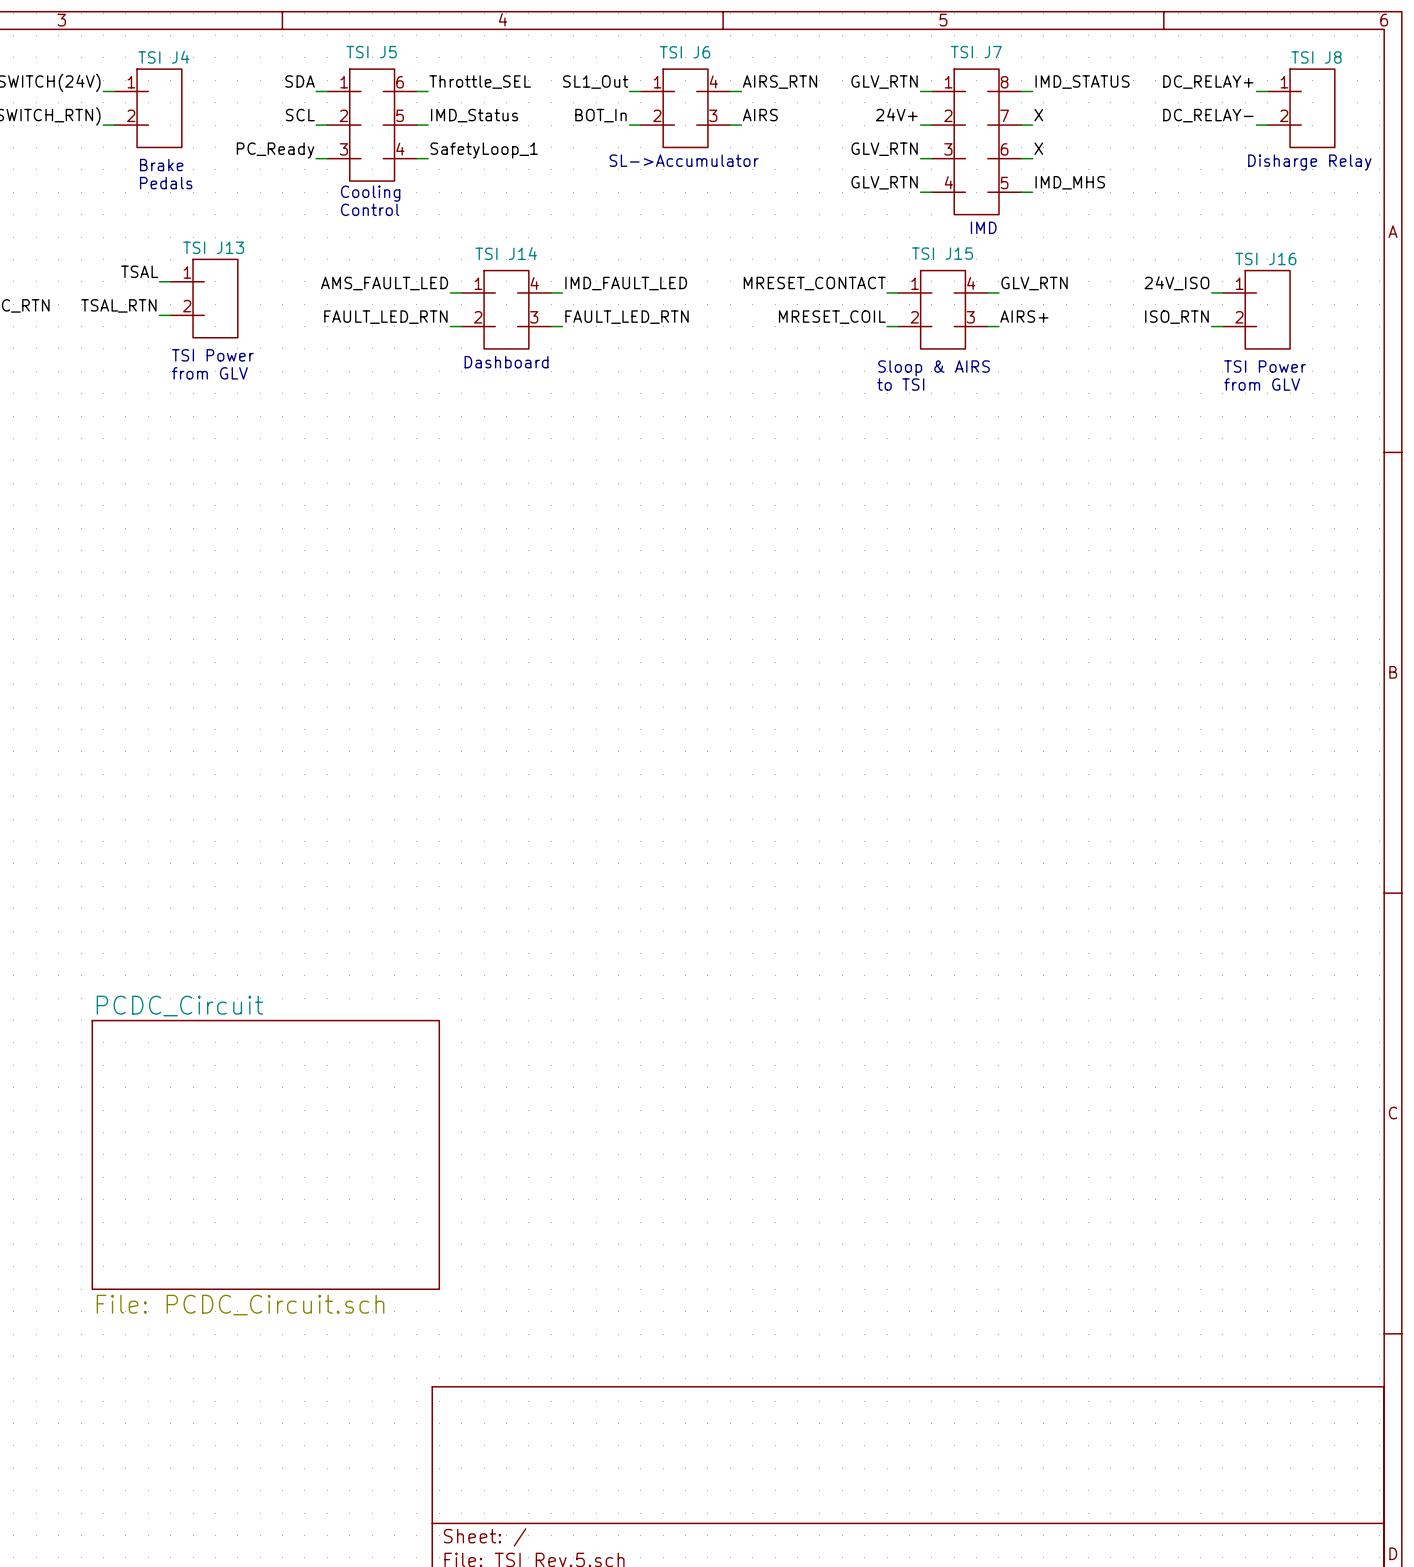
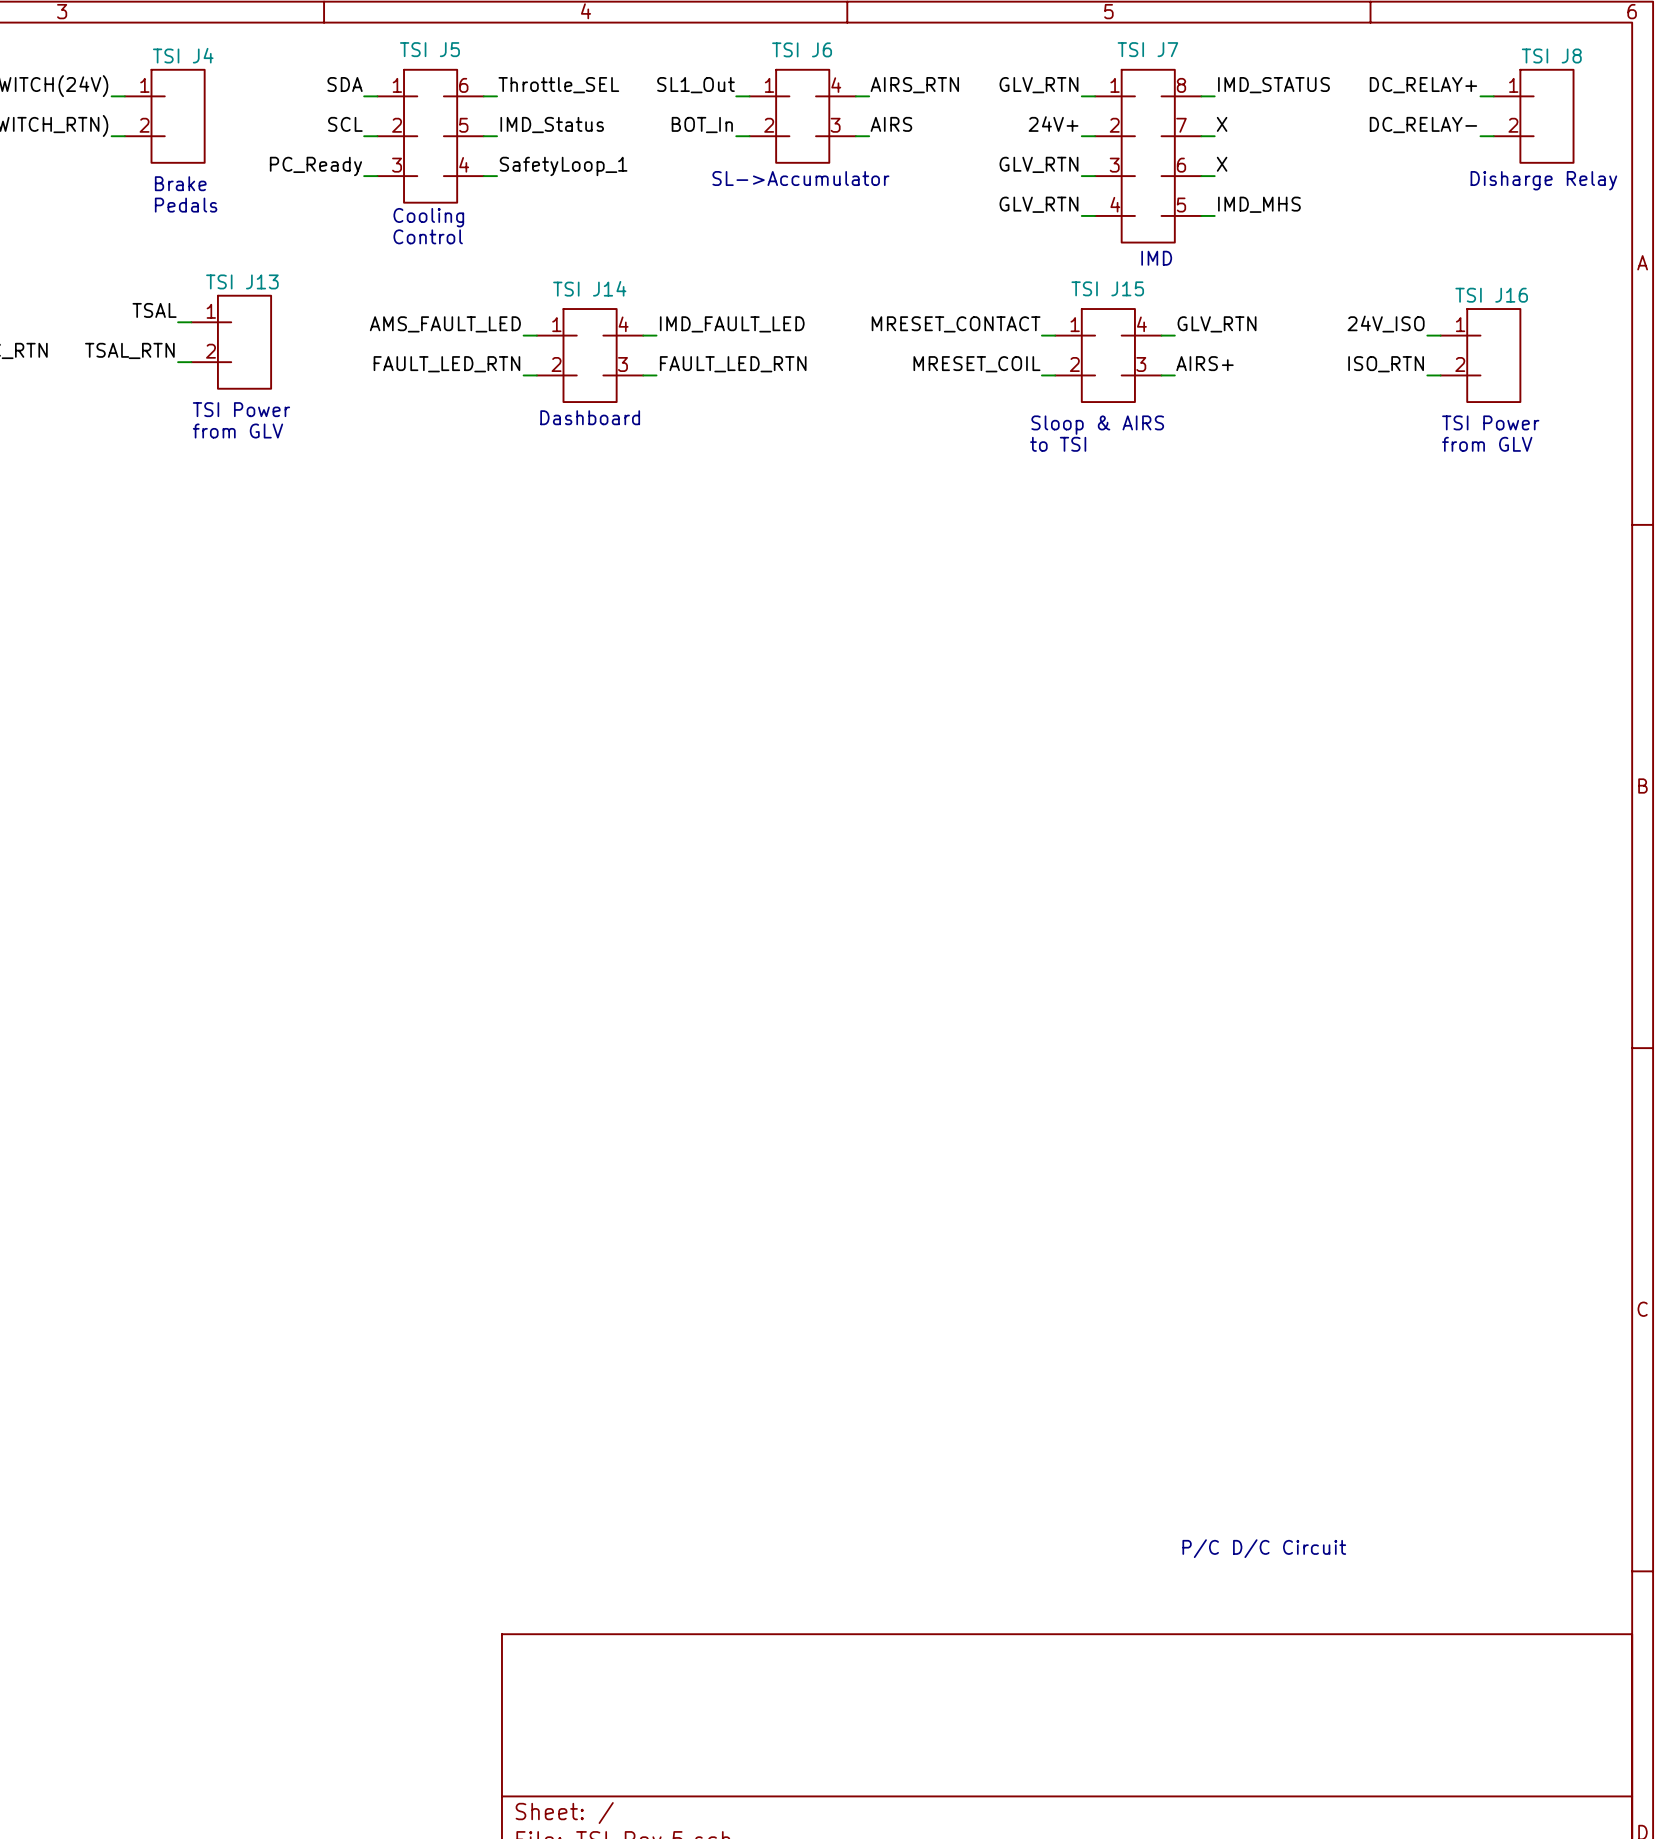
sheet PCDC_Circuit: File: PCDC_Circuit.sch (265, 1154) -> none
text: none -> P/C D/C Circuit (1264, 1548)

